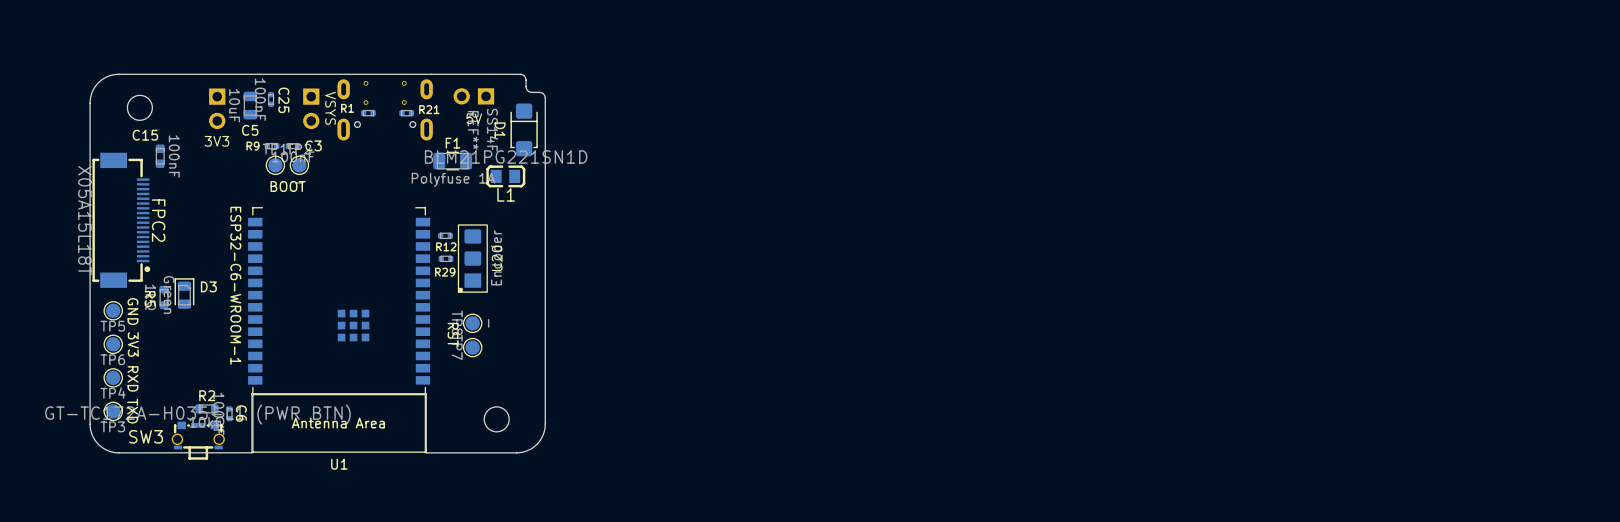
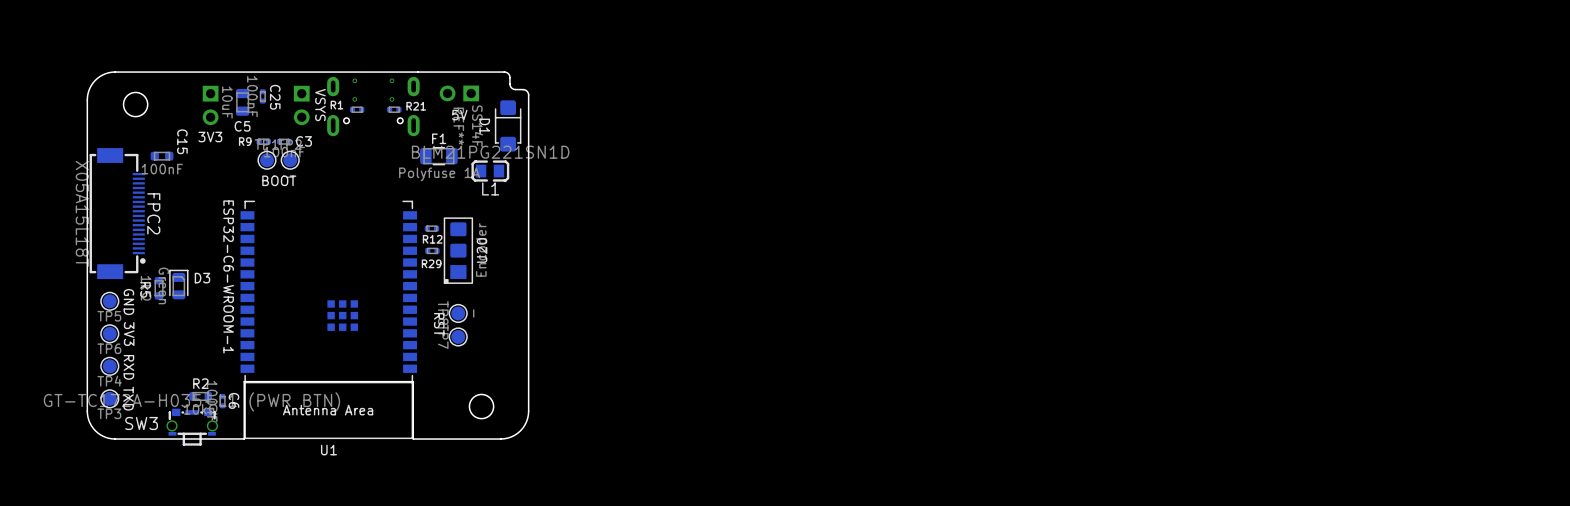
C15 rotation: 0° (160, 156) -> 90° clockwise (162, 156)

